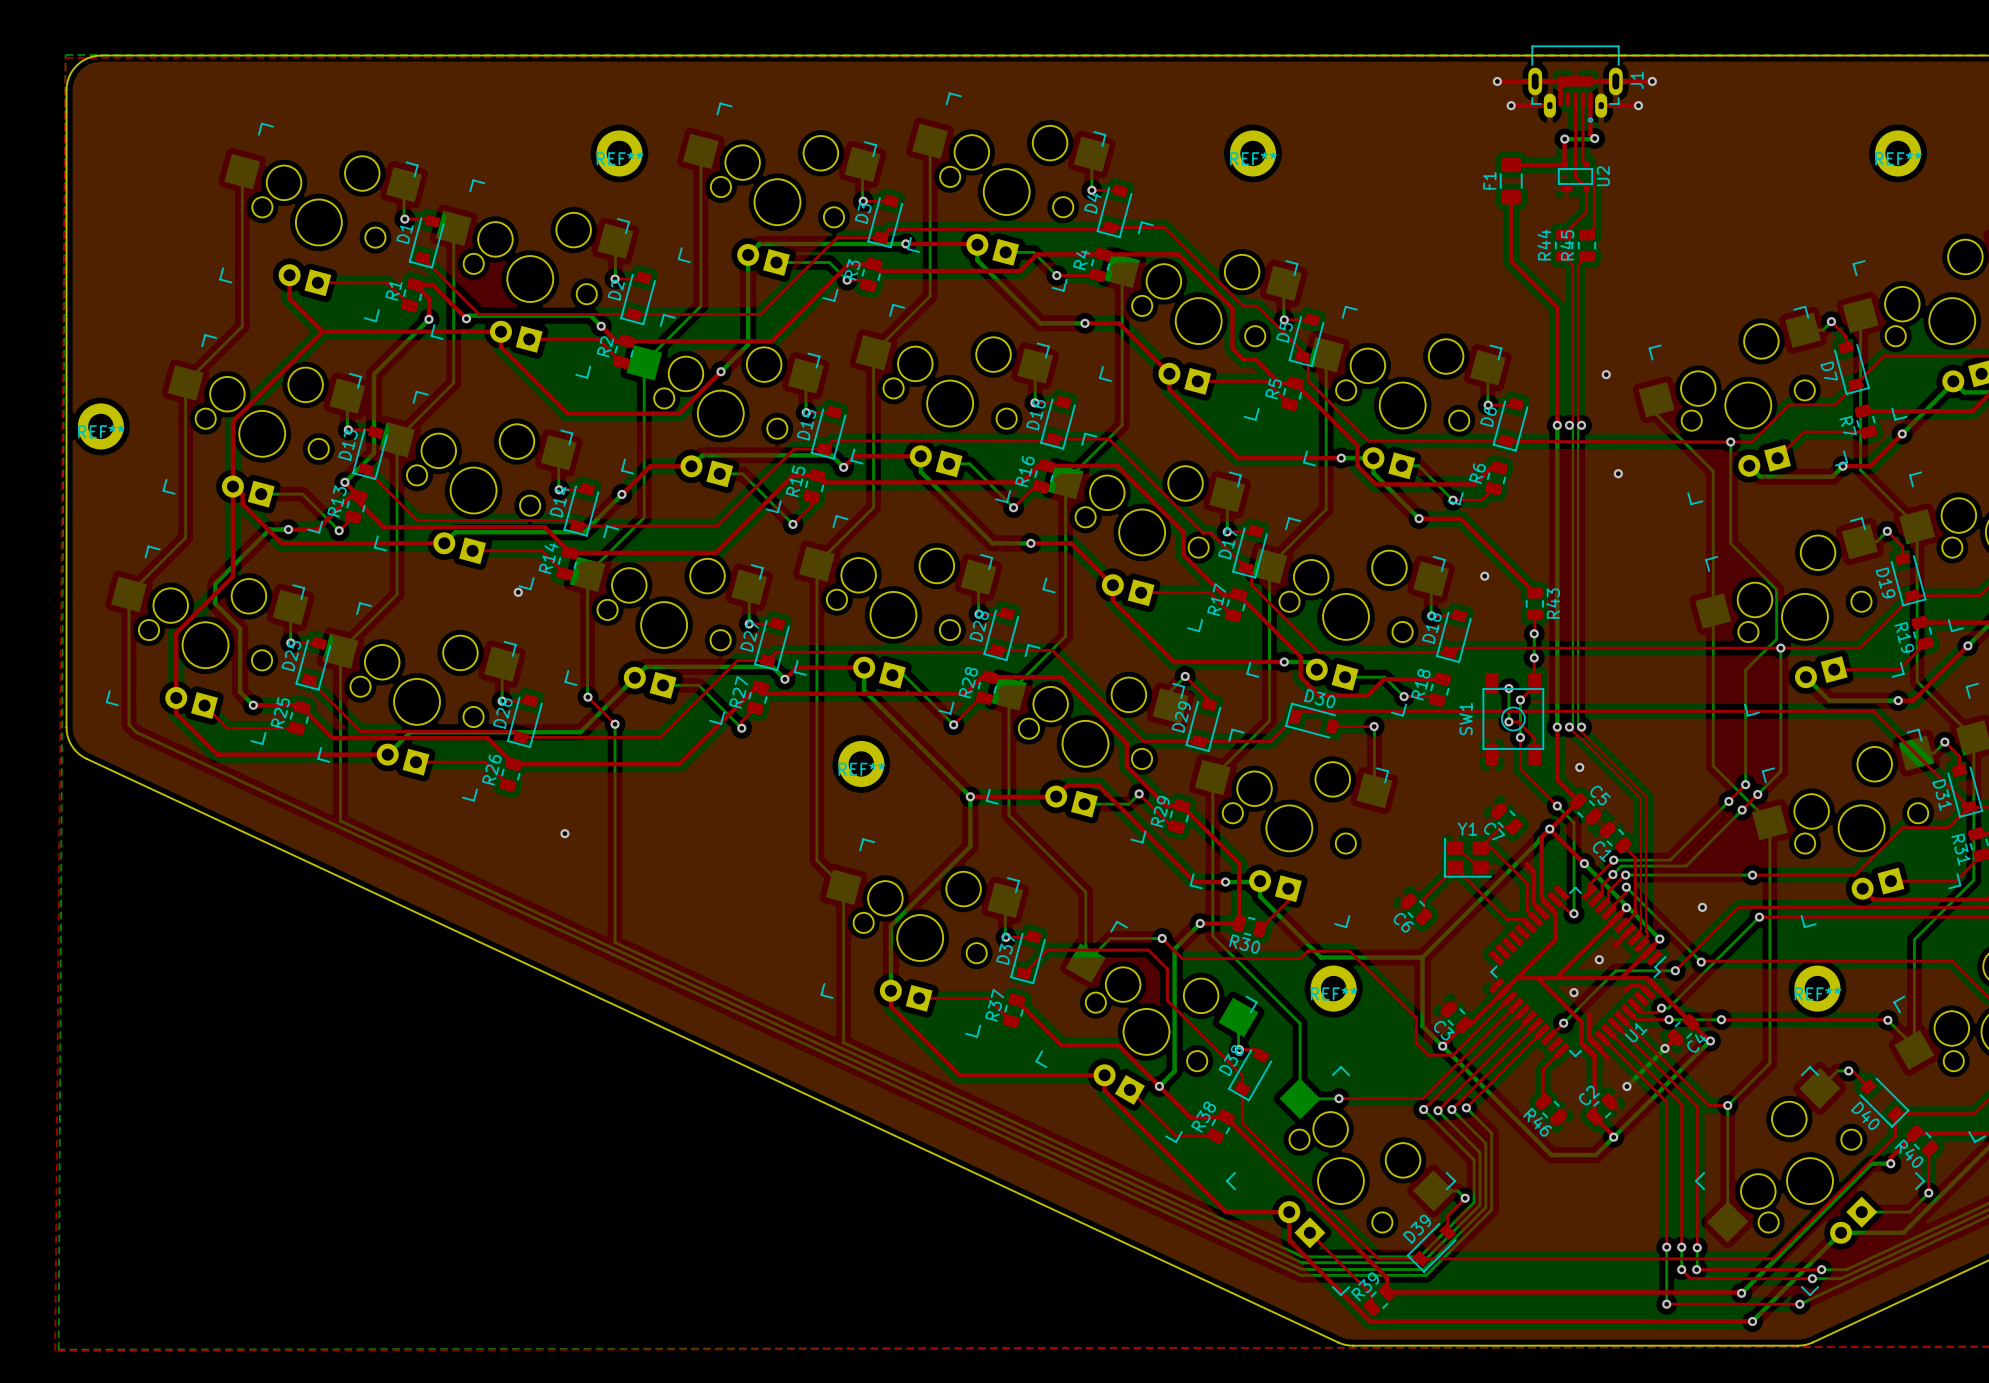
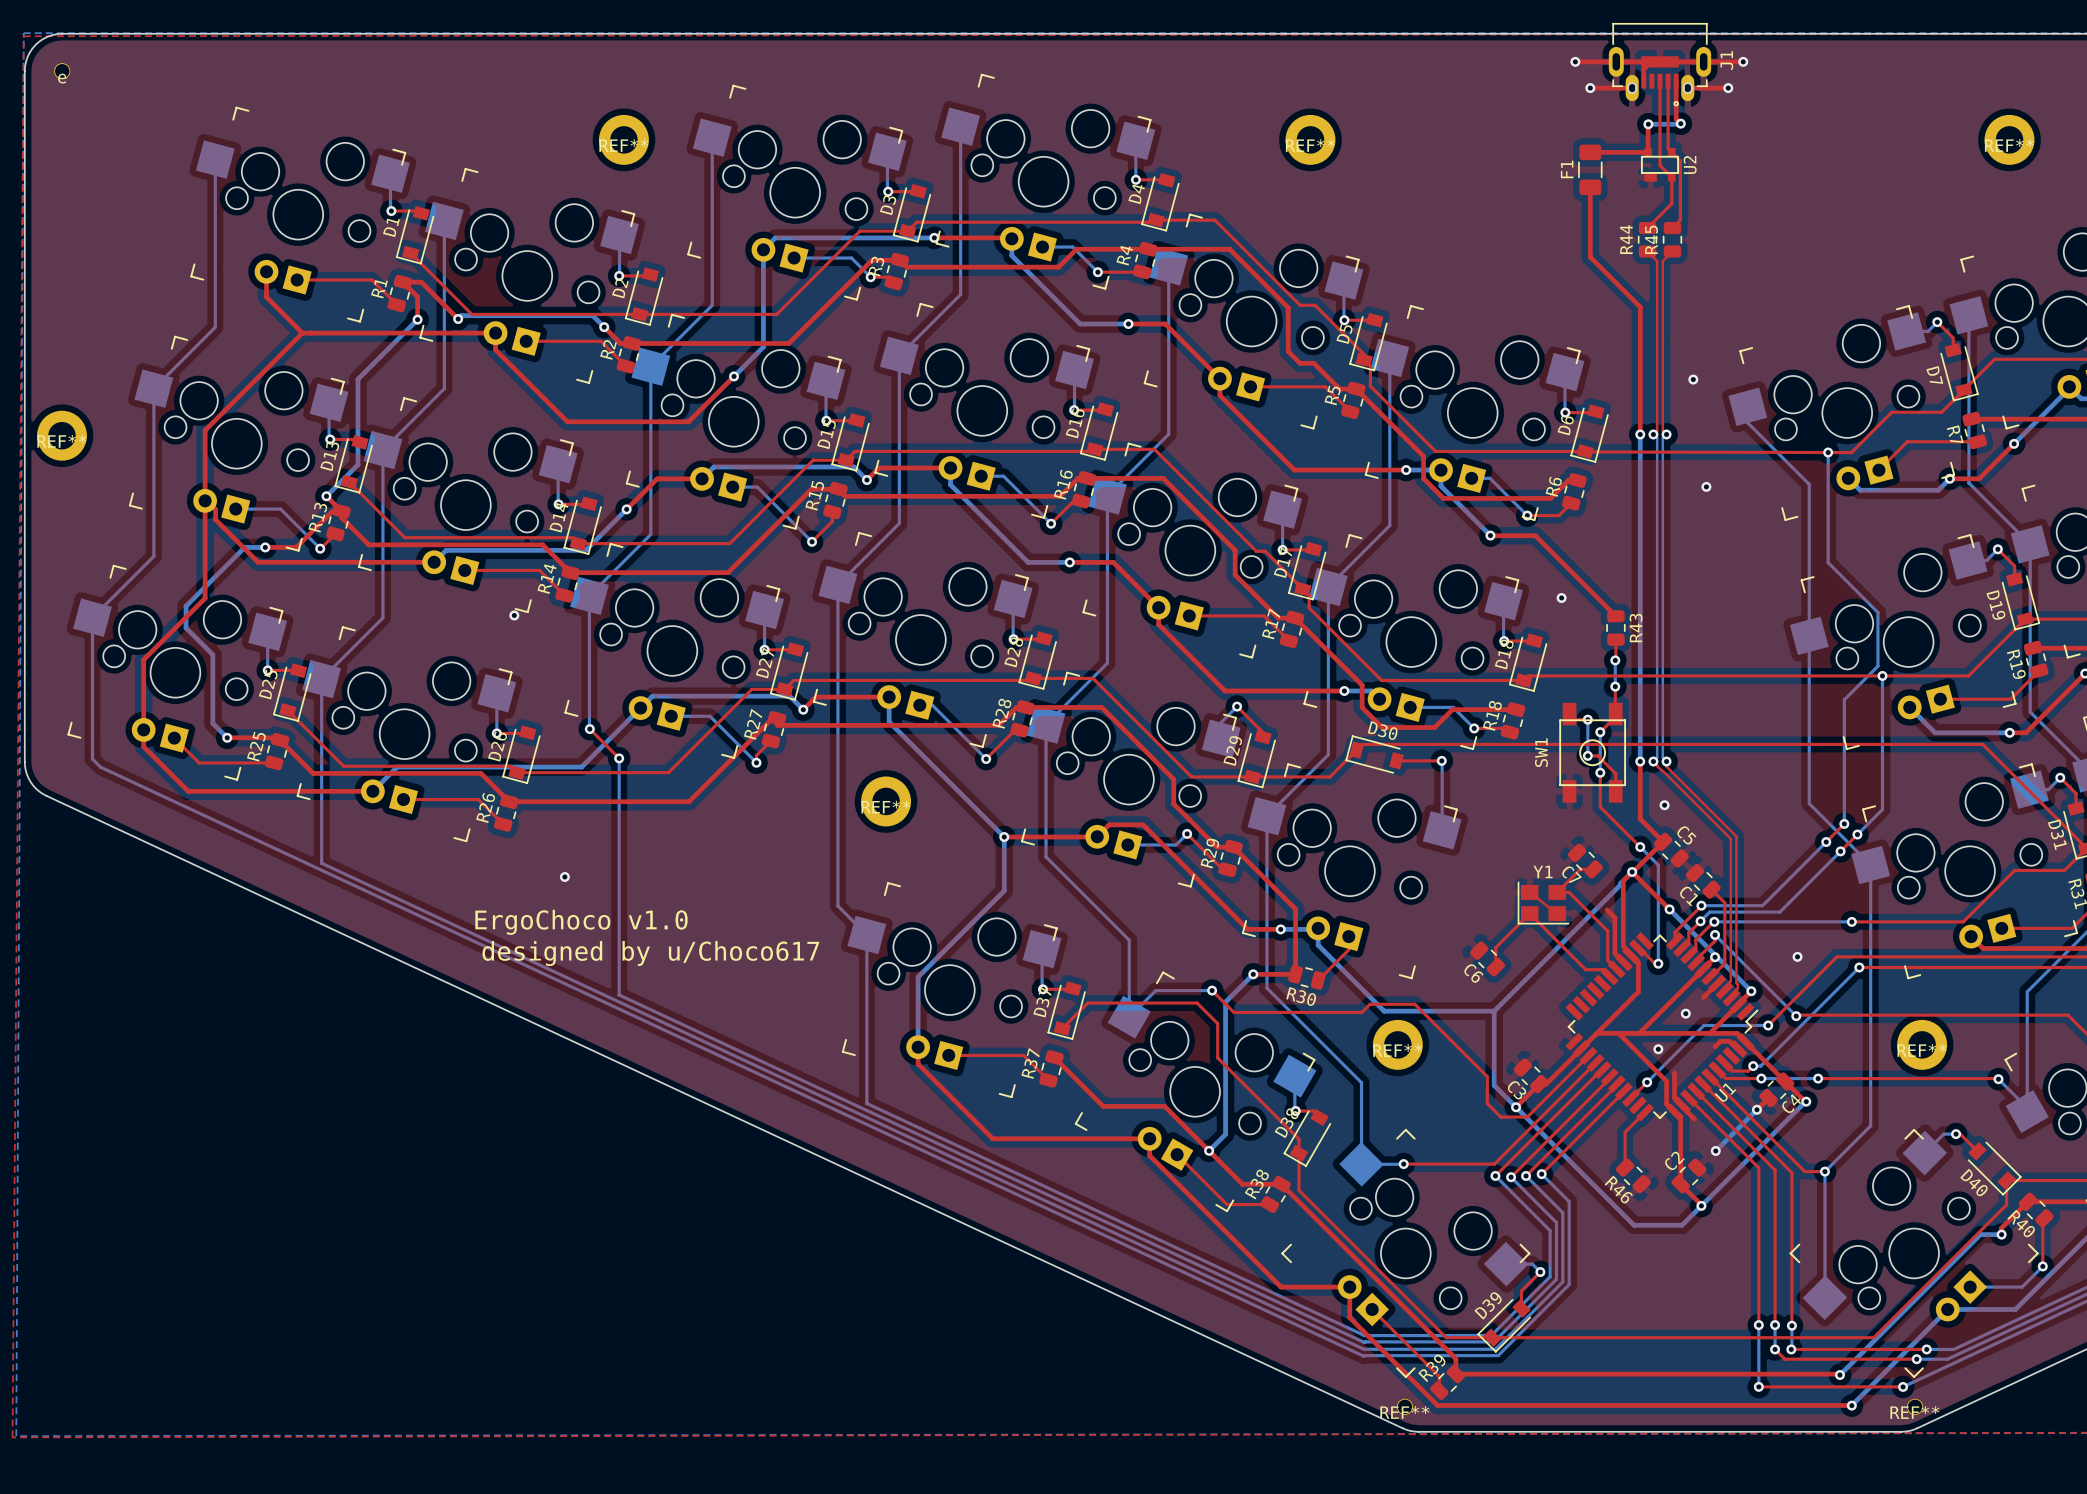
e: none -> (62, 71)
text: none -> ErgoChoco v1.0 (581, 922)
text: none -> designed by u/Choco617 (650, 953)
REF**: none -> (1404, 1406)
REF**: none -> (1915, 1406)

